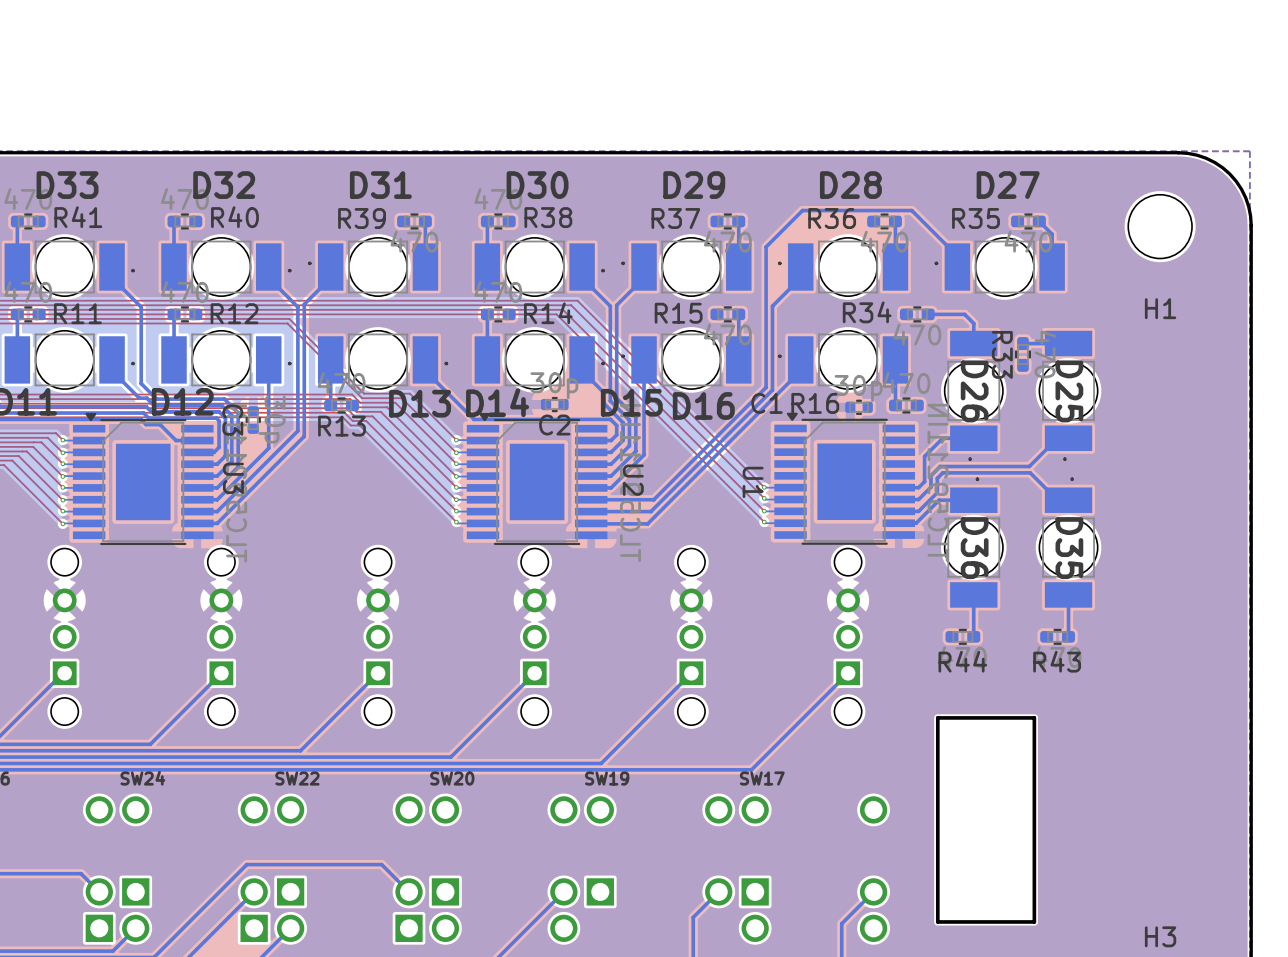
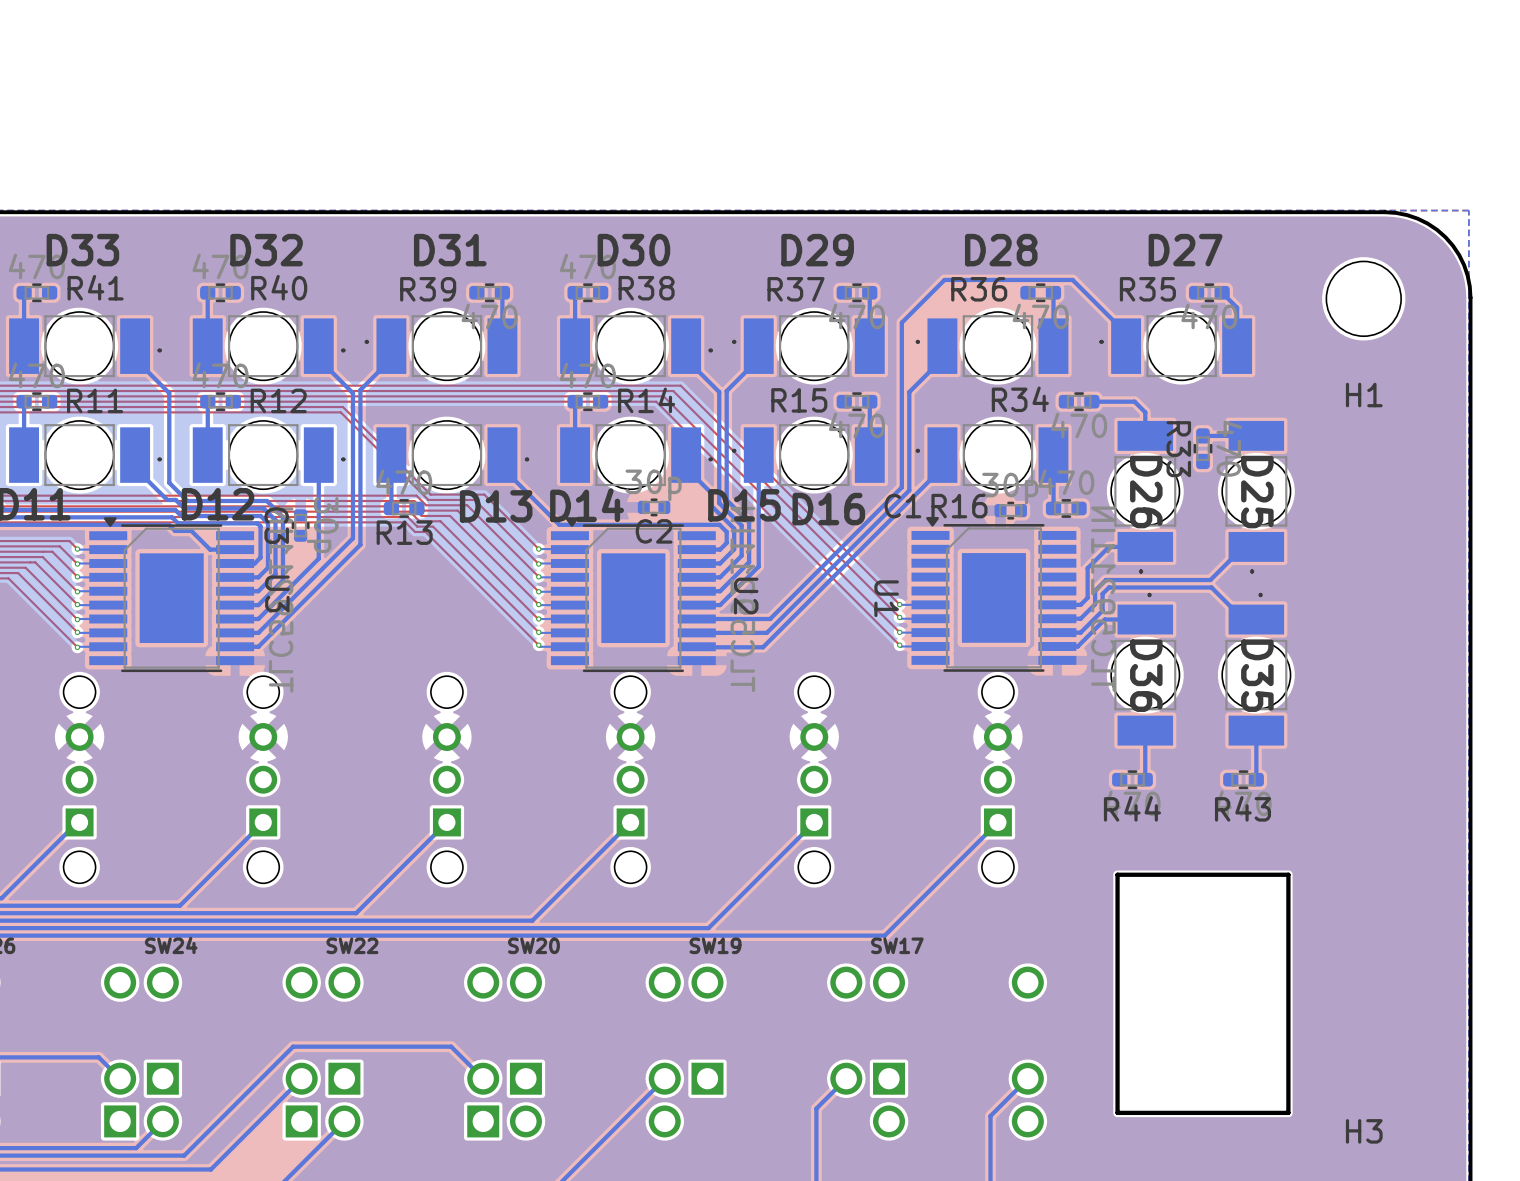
board edge: (1034, 717) (1034, 921) (937, 921) (937, 717) (950, 717) -> (1216, 874) (1288, 874) (1288, 1112) (1117, 1112) (1117, 874)

